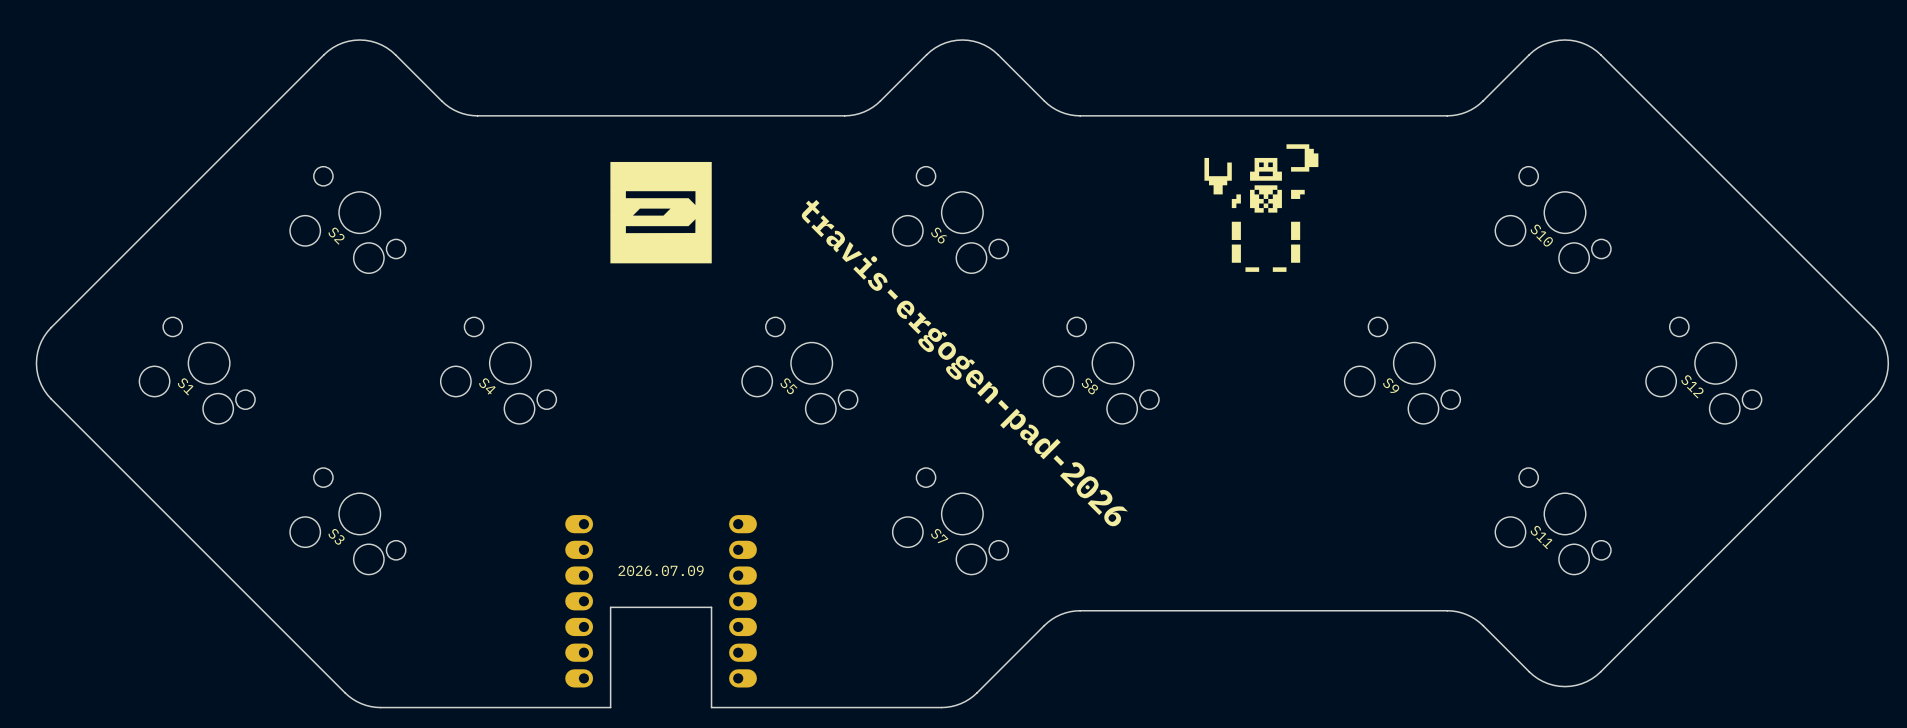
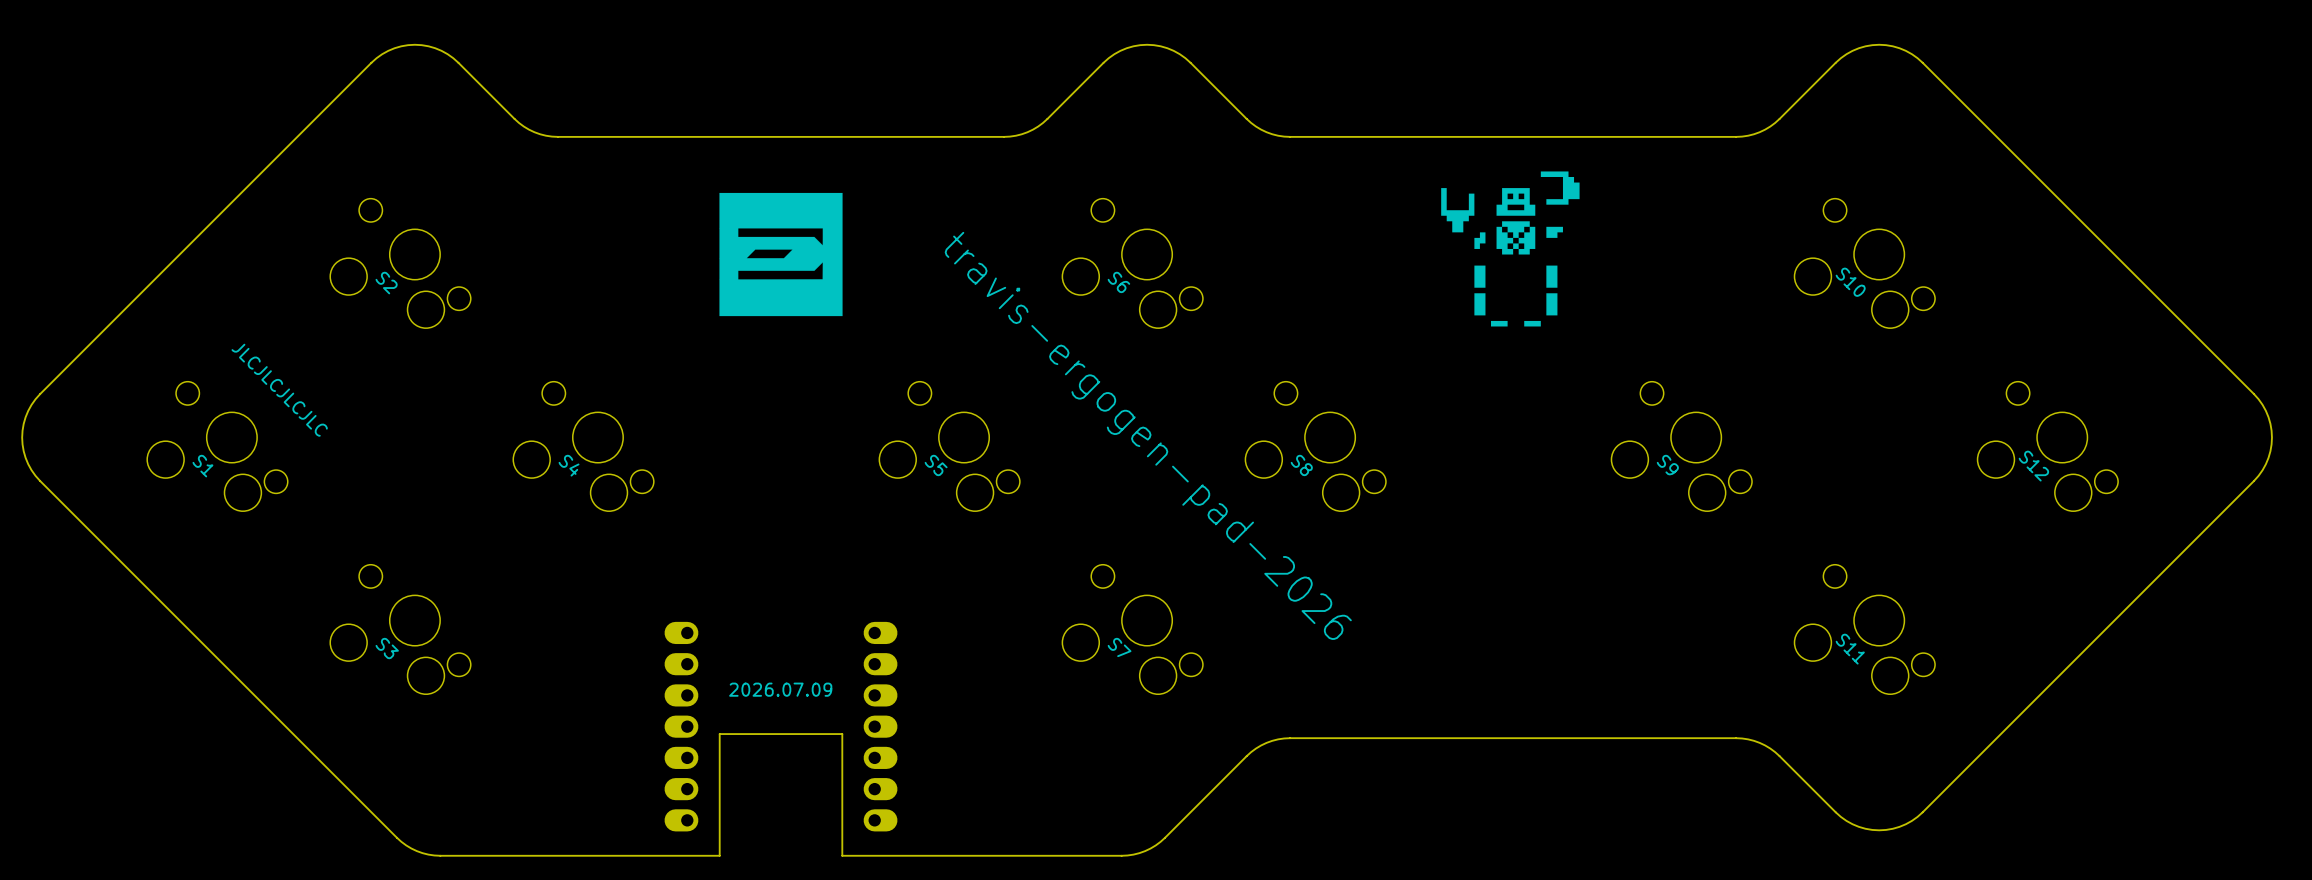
text: none -> JLCJLCJLCJLC (279, 390)

